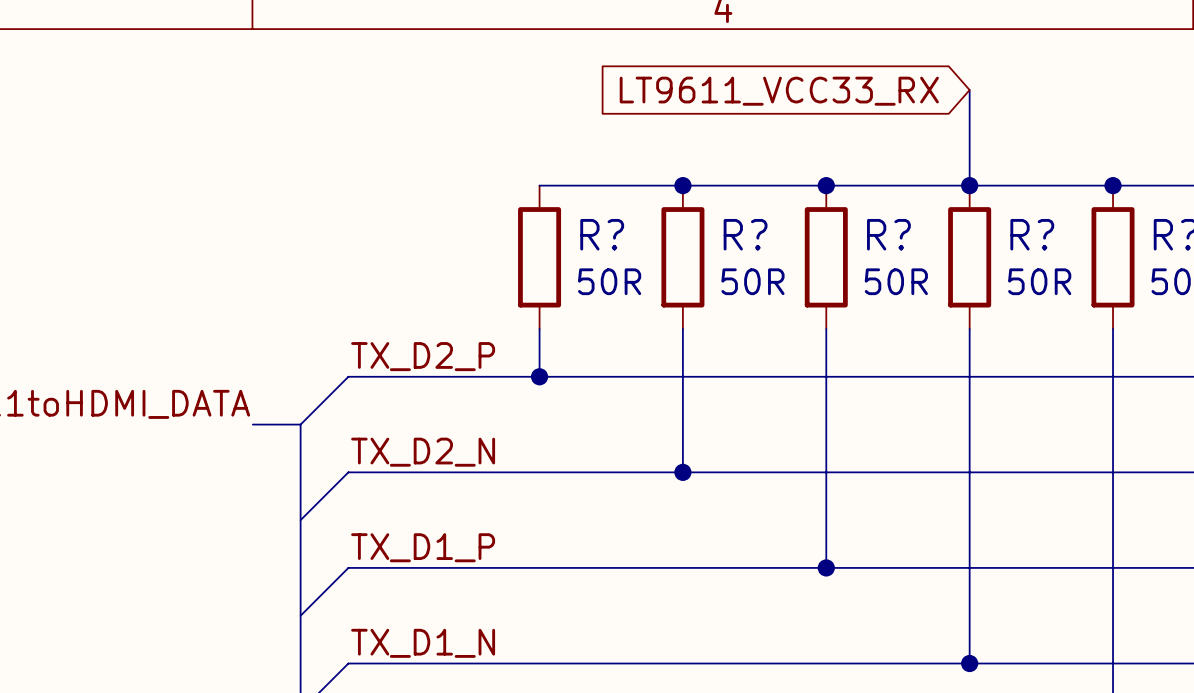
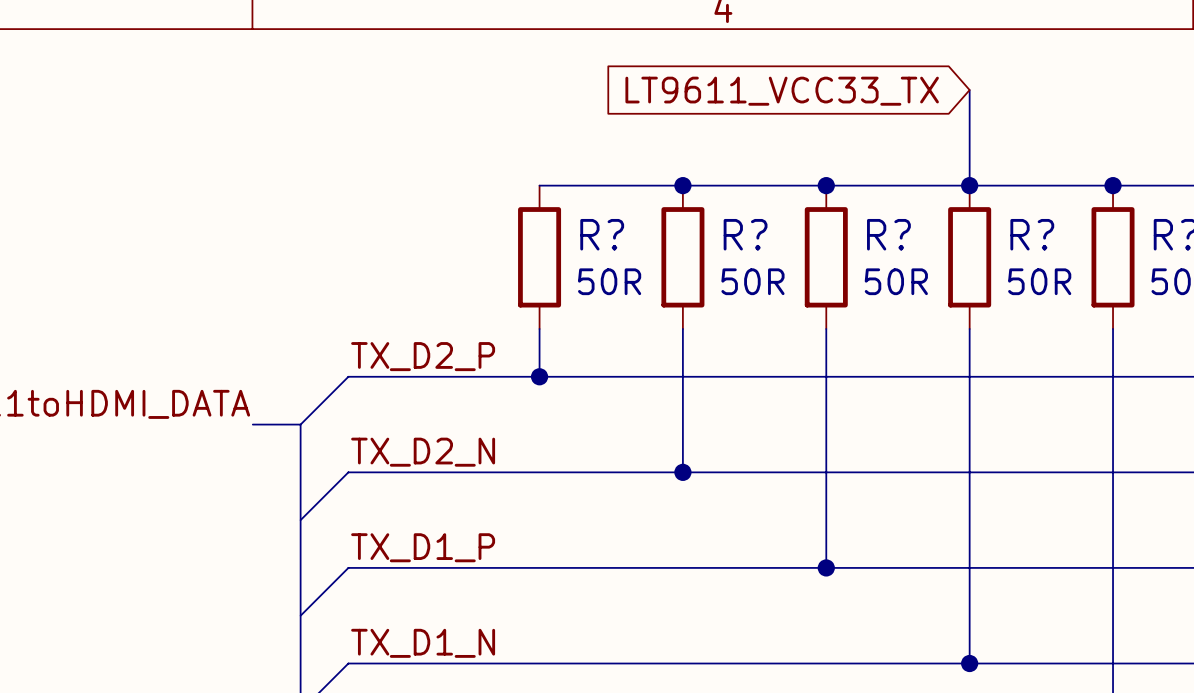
global label: LT9611_VCC33_RX (779, 91) -> LT9611_VCC33_TX (782, 91)

